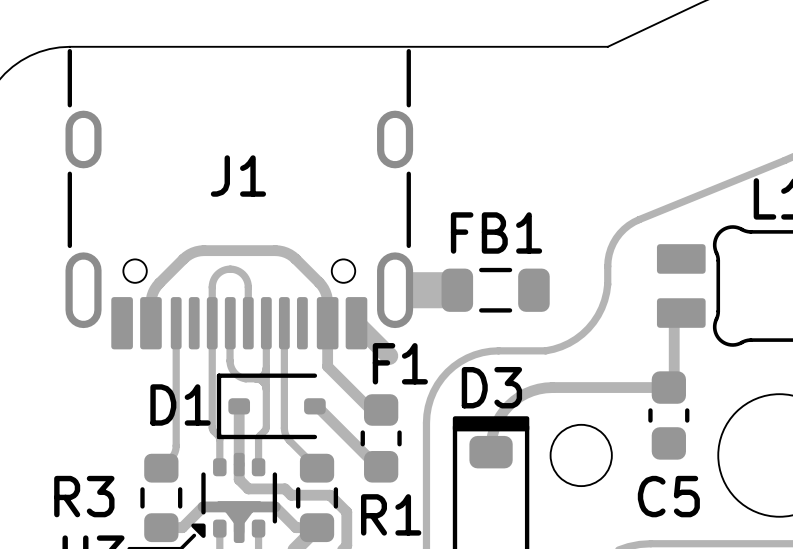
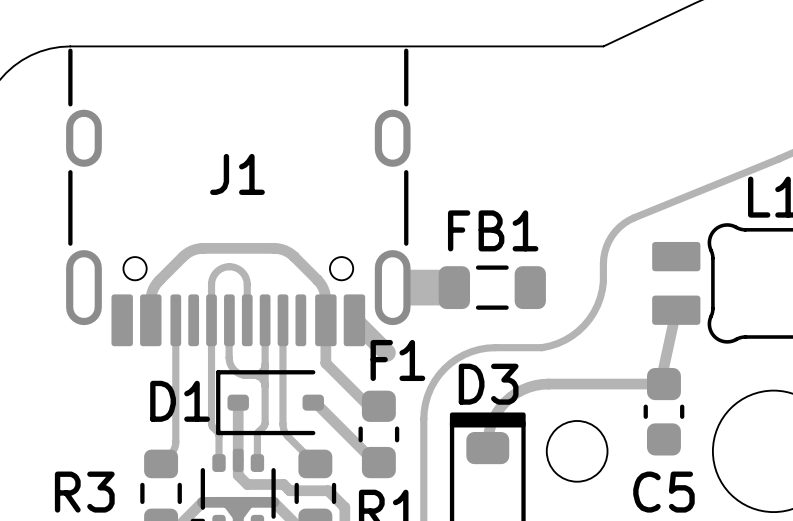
track: (674, 313) (674, 387) -> none
track: none -> (676, 310) (660, 384)

